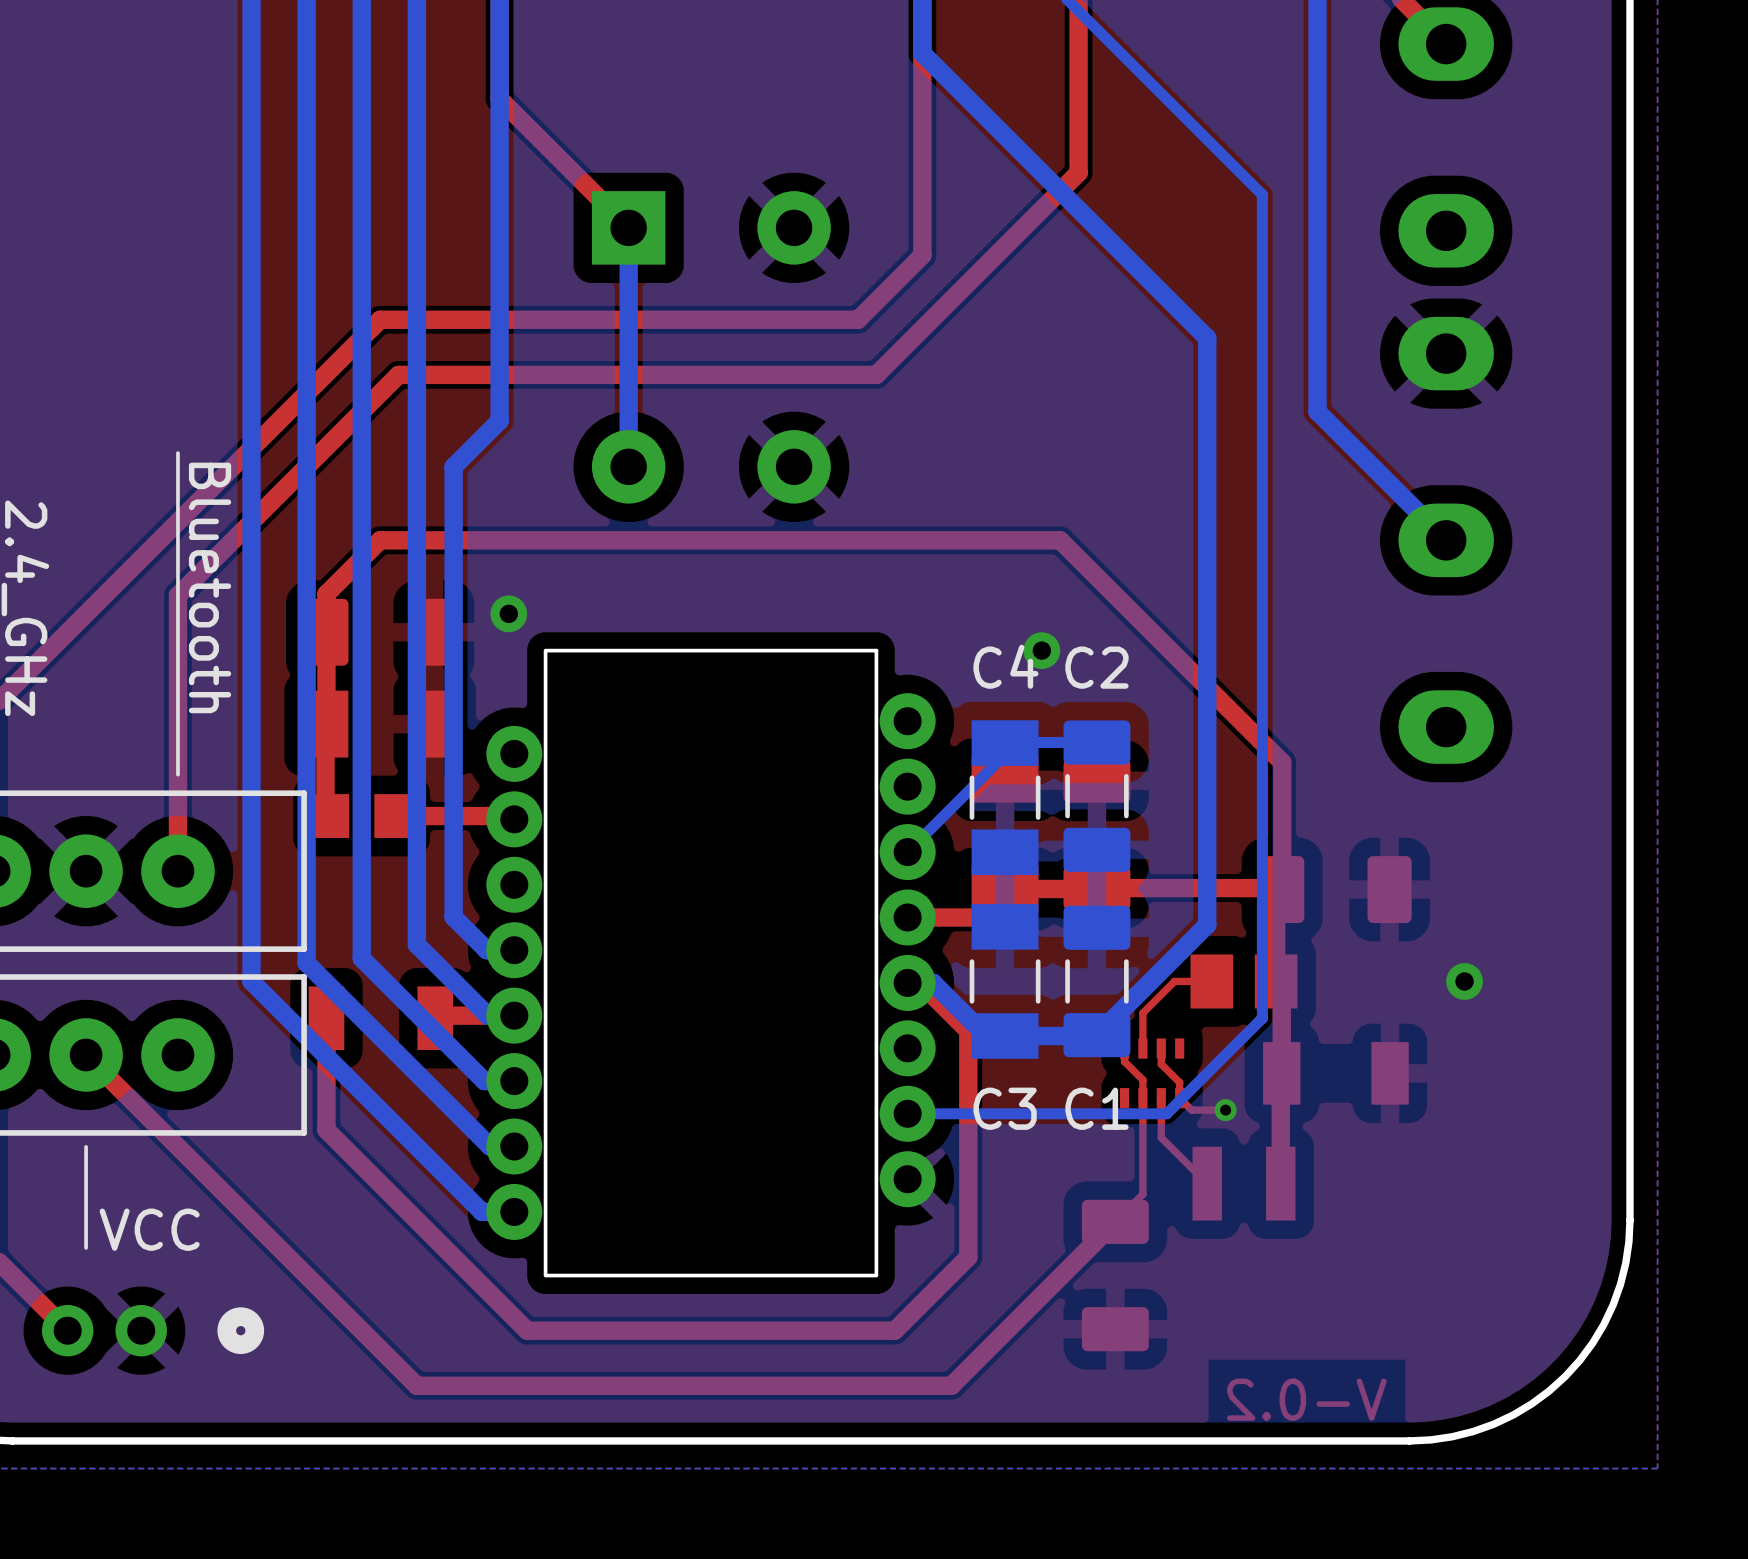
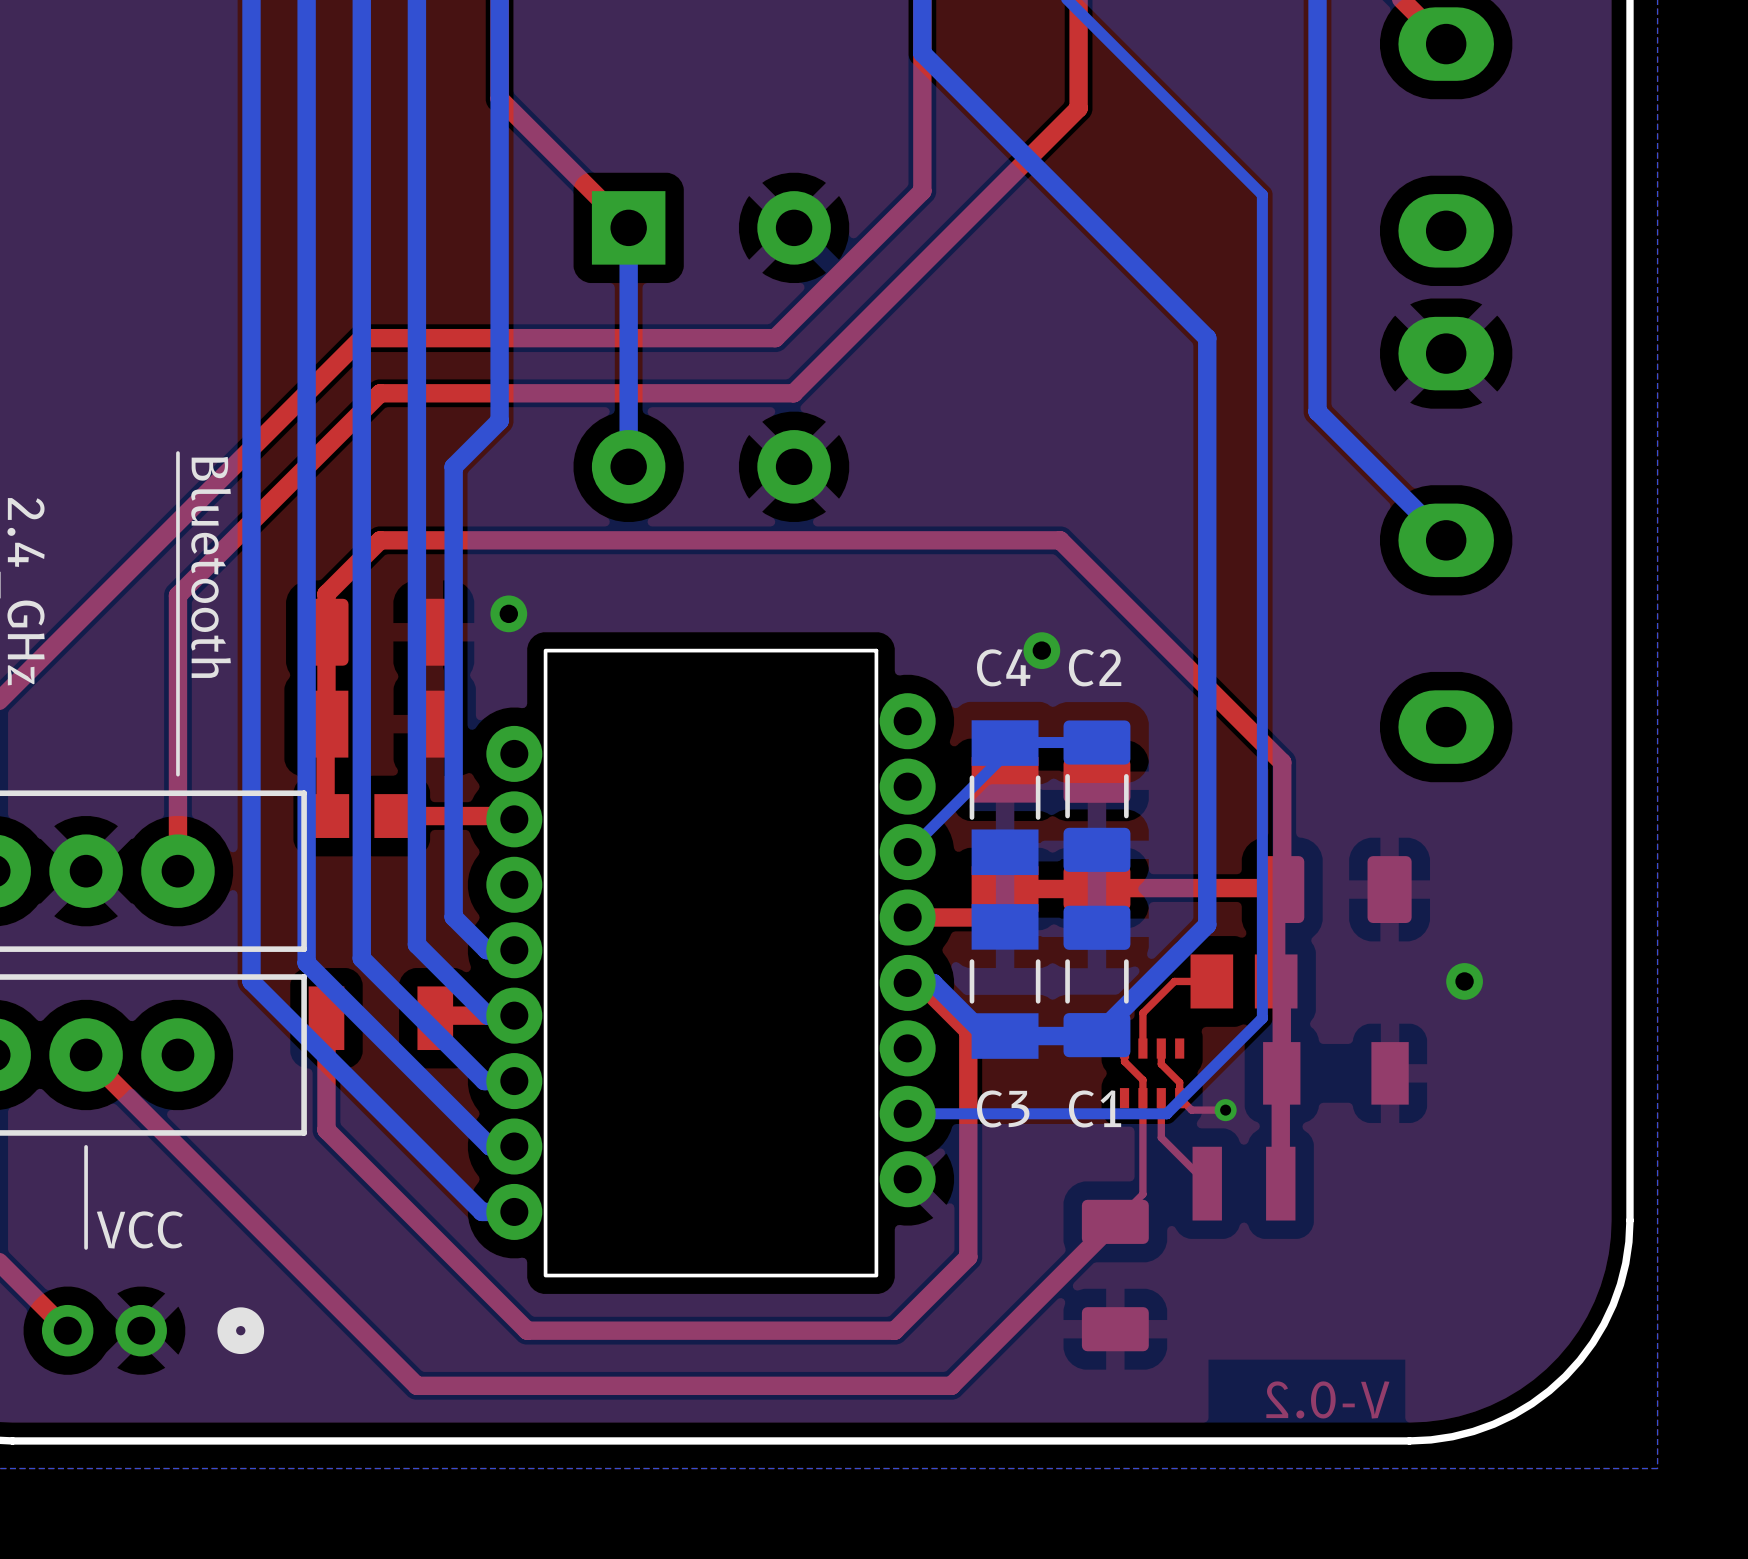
top track: (1078, 108) (1078, 172) (876, 374) (398, 374) (380, 393) -> (1078, 108) (793, 393) (380, 393)
top track: (922, 191) (922, 255) (858, 319) (380, 319) (361, 338) -> (922, 191) (775, 338) (361, 338)

